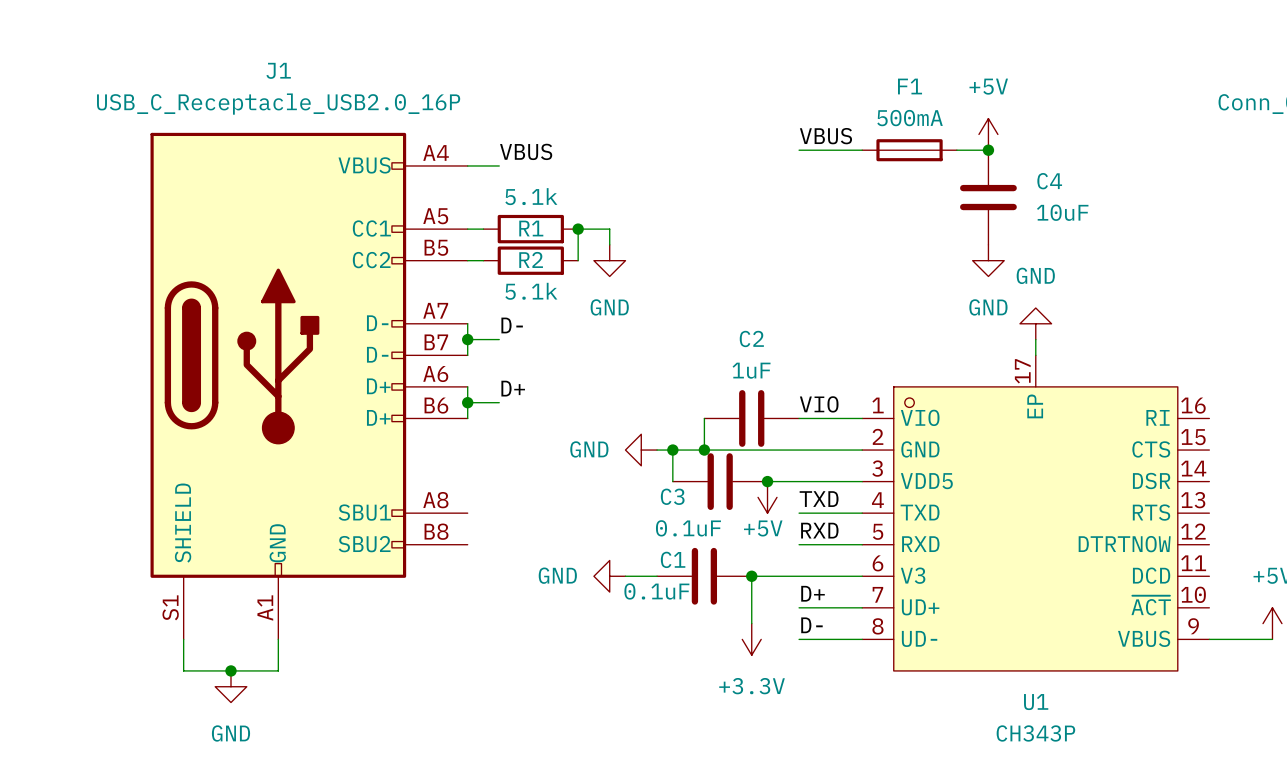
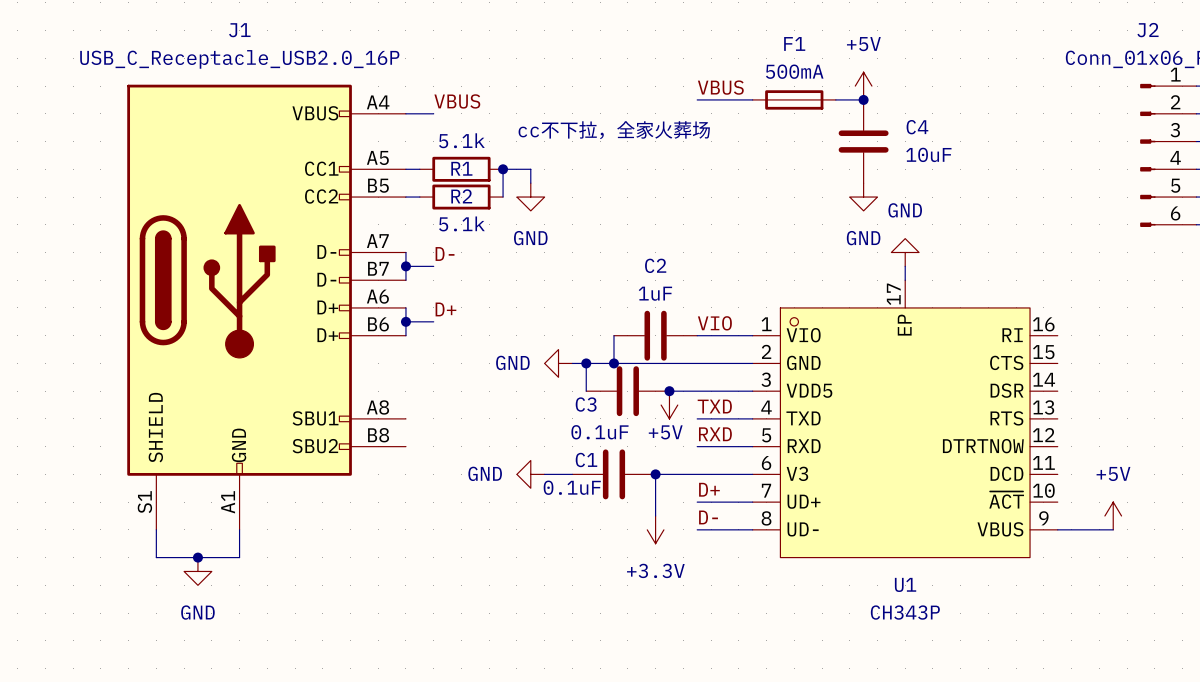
text: none -> cc不下拉，全家火葬场 (614, 130)

